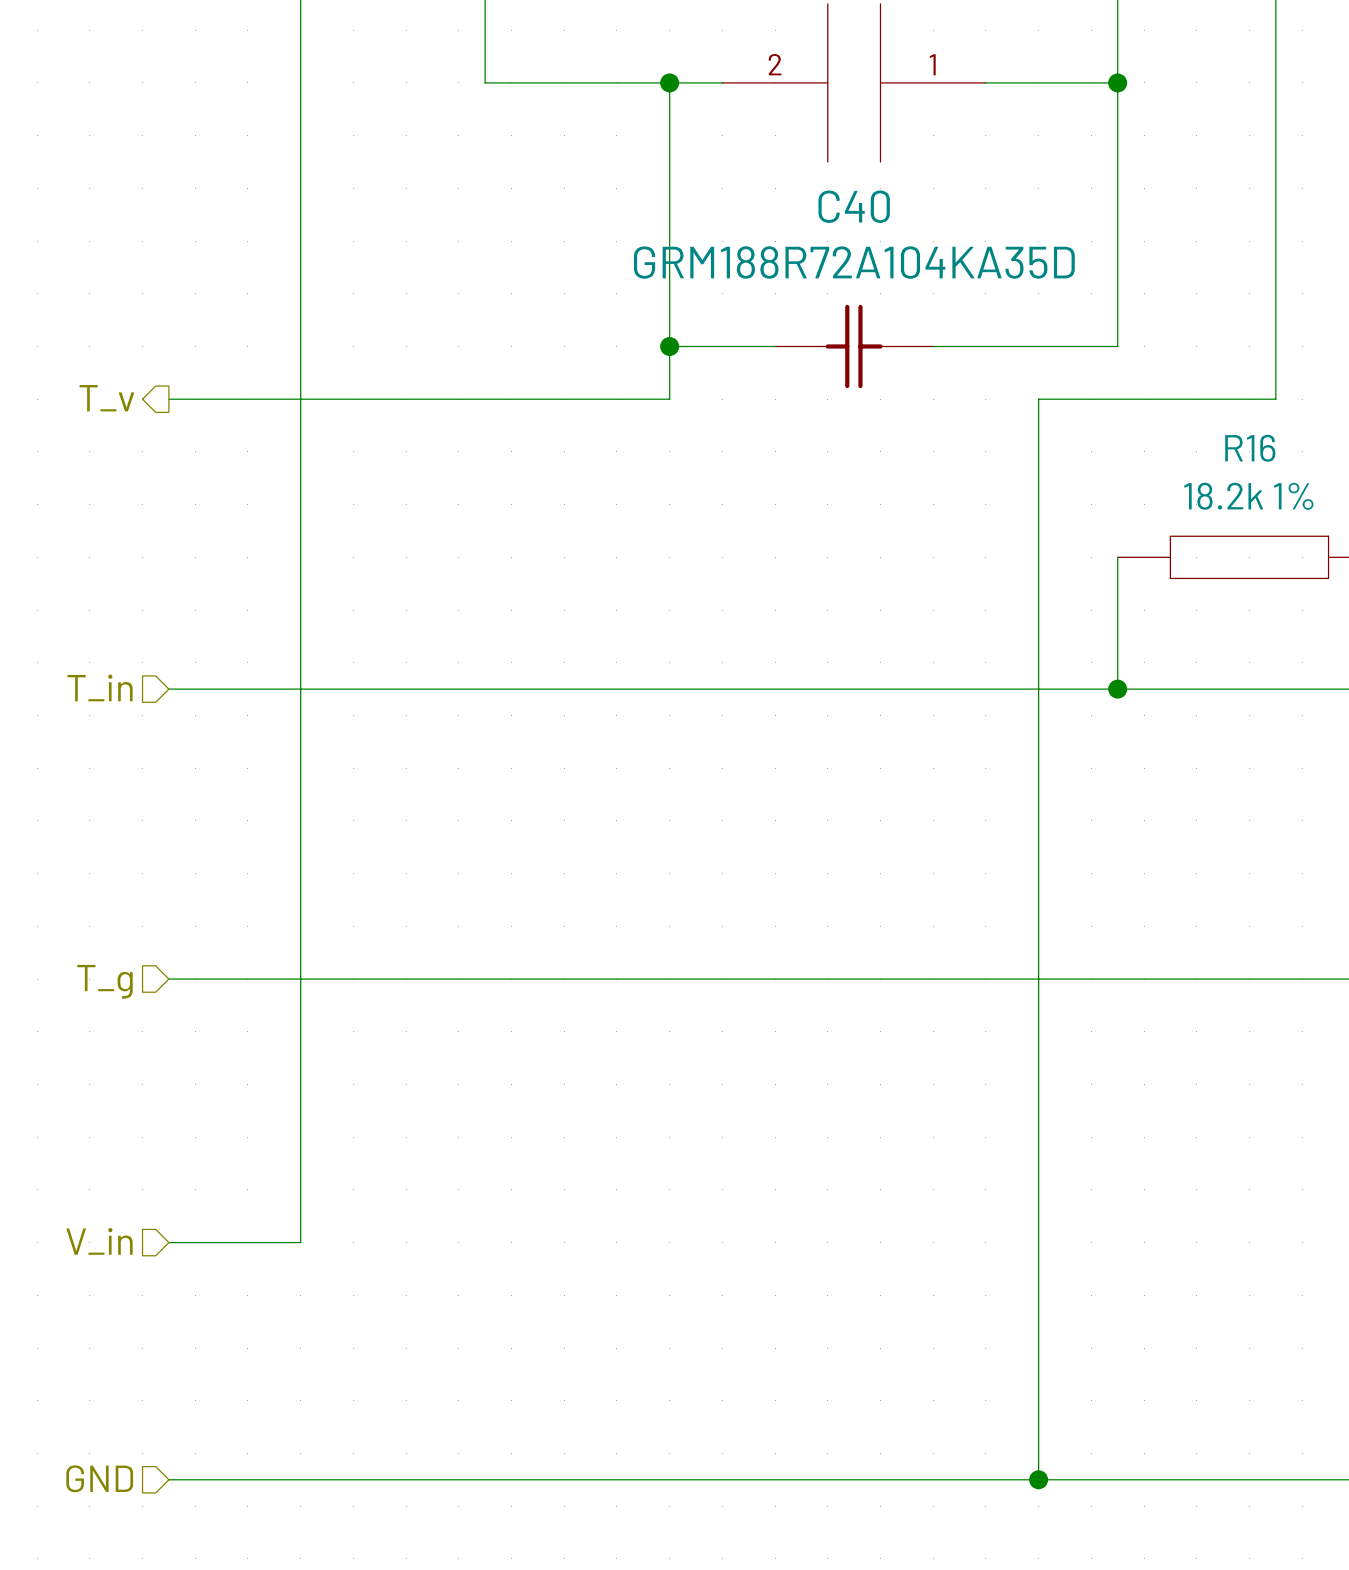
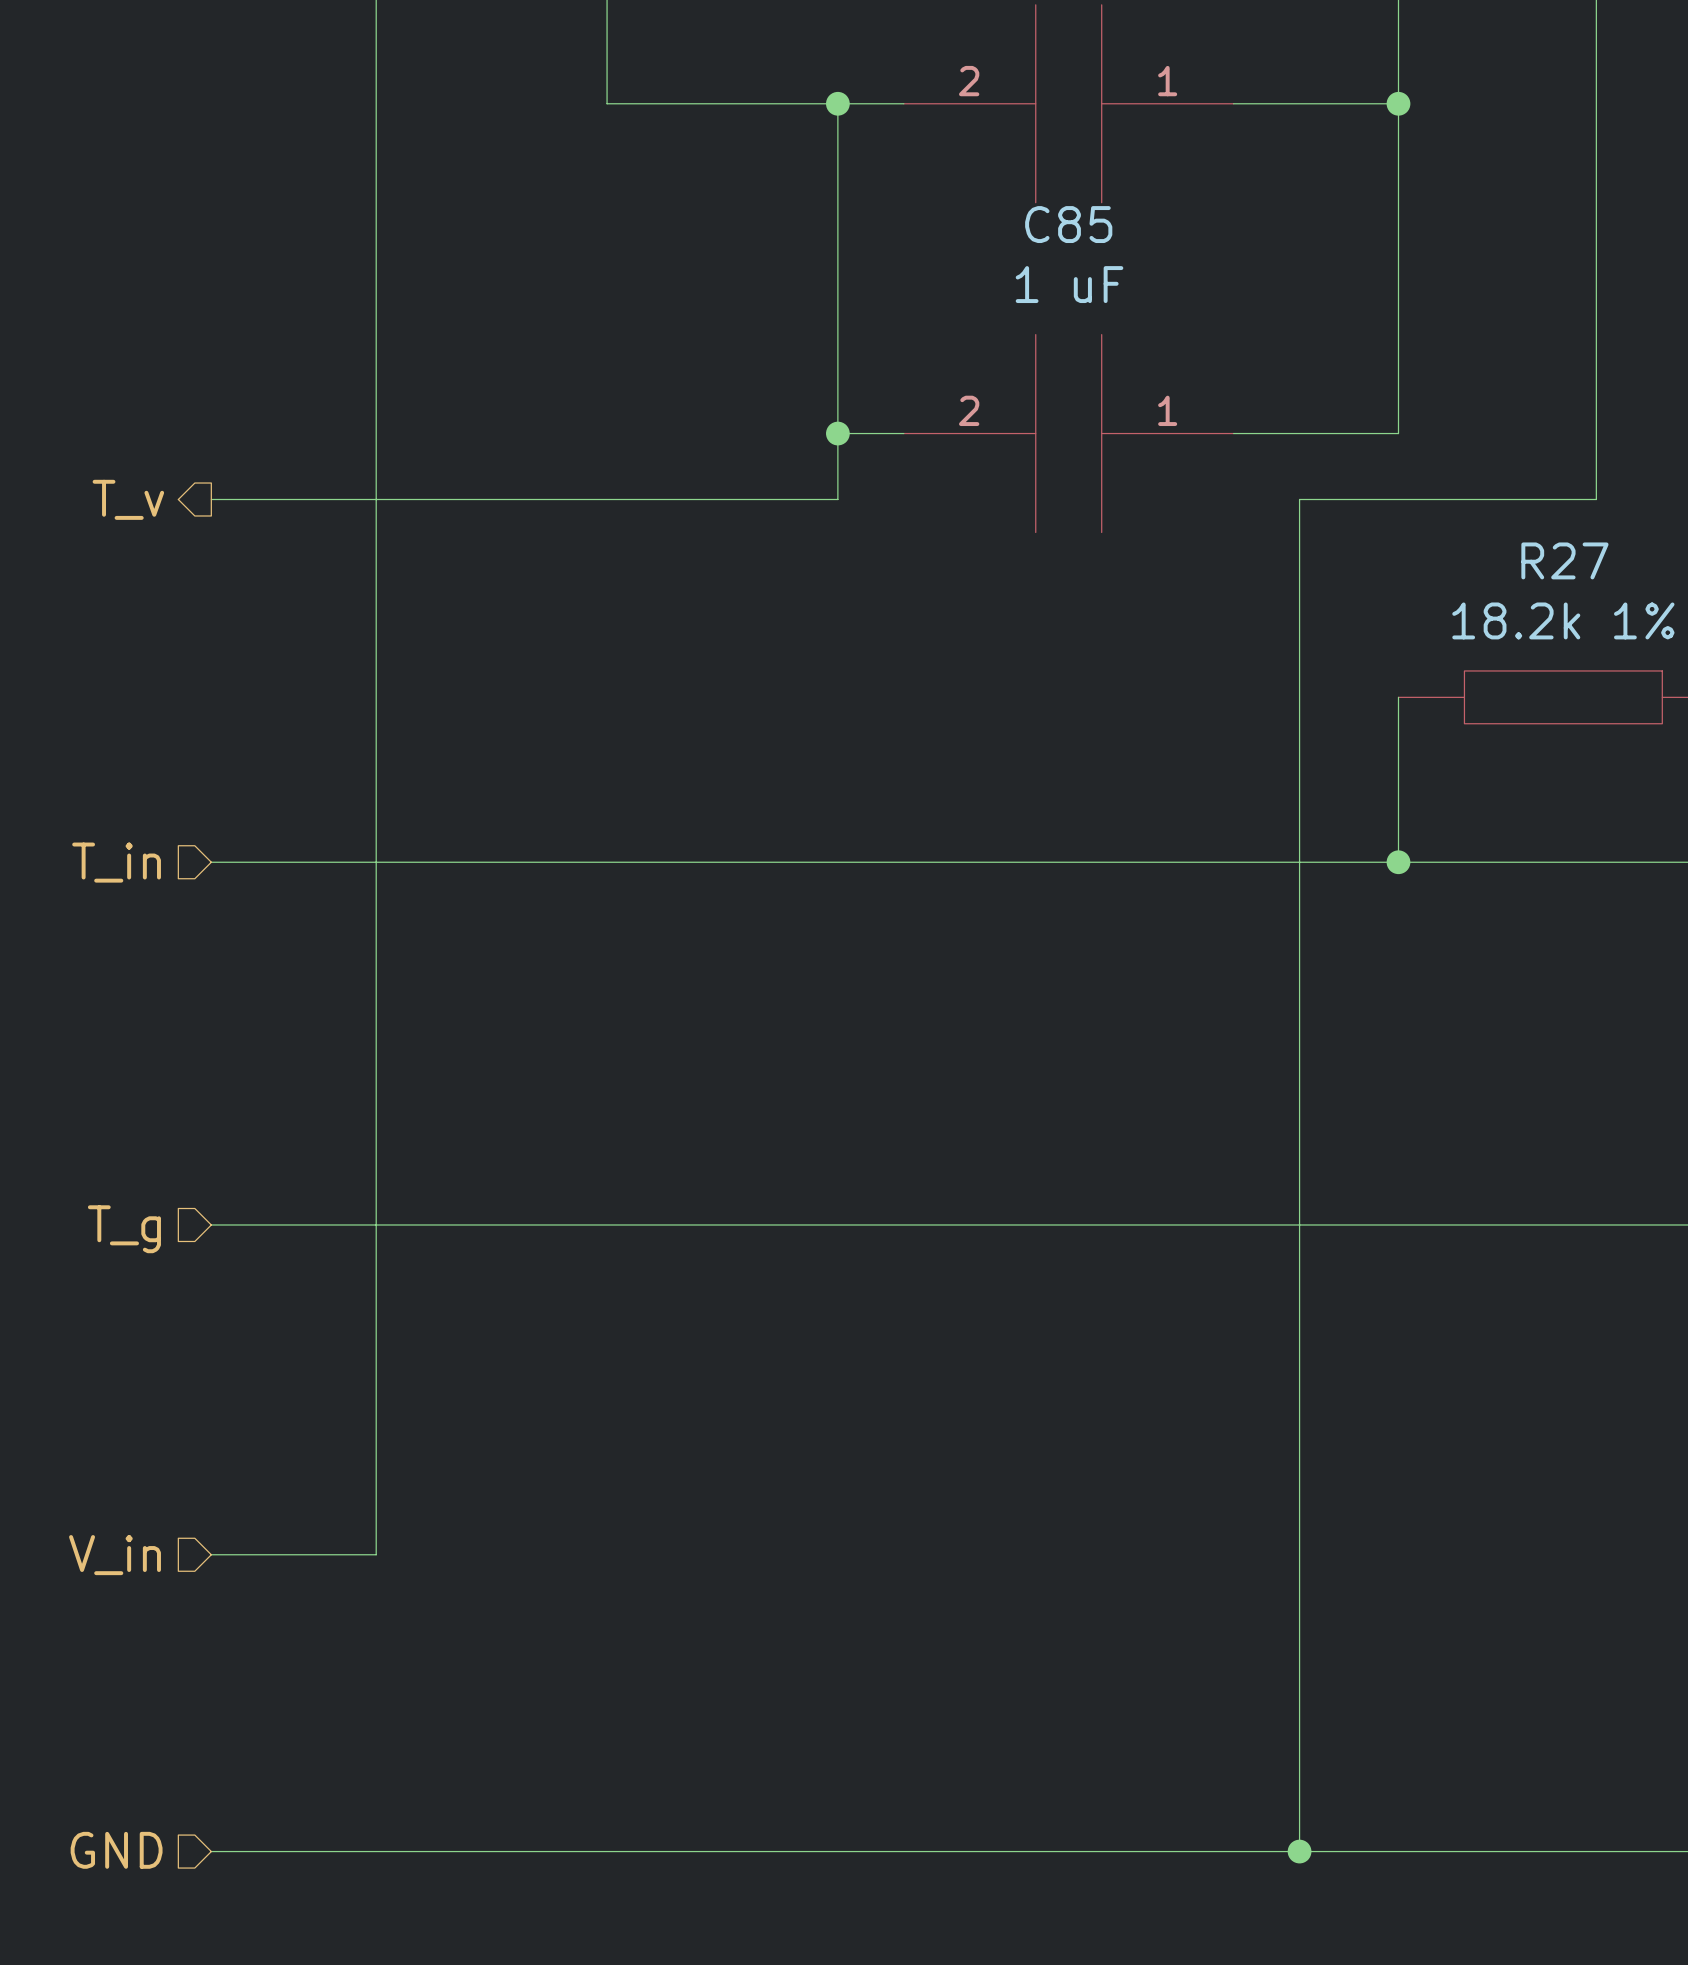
C40: GRM188R72A104KA35D (854, 346) -> none
C85: none -> 1 uF (1068, 433)
R16 name: R16 (1250, 448) -> R27 (1564, 560)

